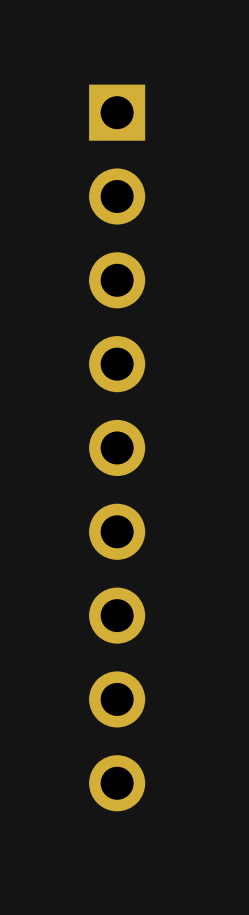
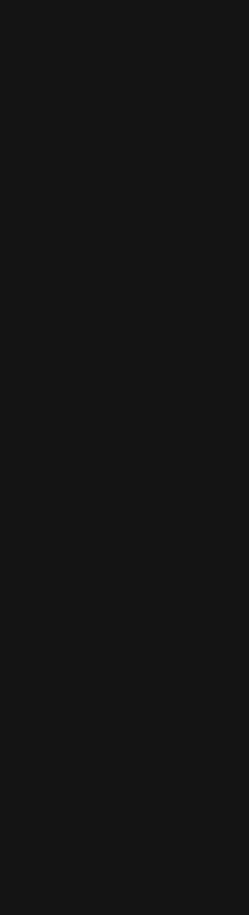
part: (117, 447) -> none

